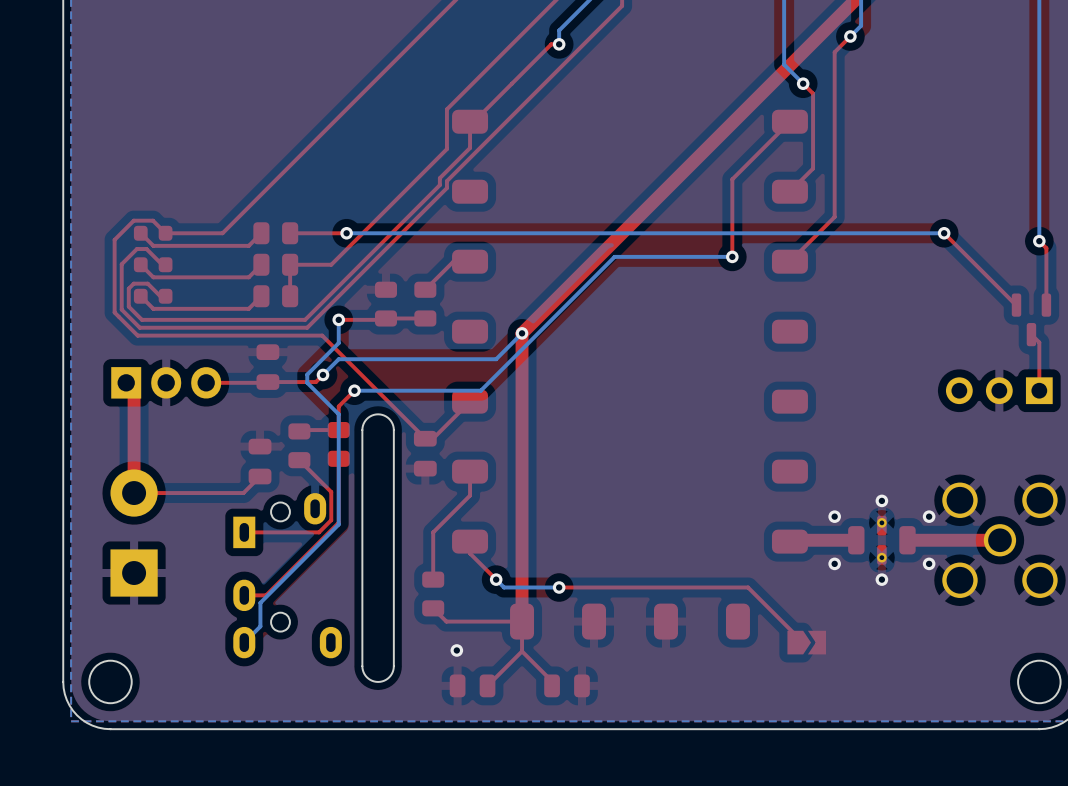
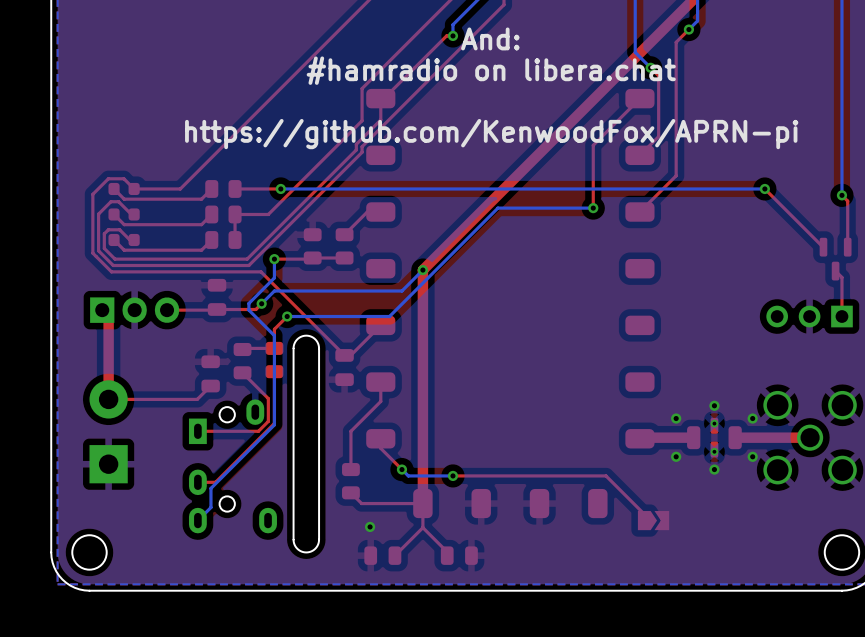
text: none -> And: (490, 38)
text: none -> #hamradio on libera.chat (491, 70)
text: none -> https://github.com/KenwoodFox/APRN-pi (491, 134)

